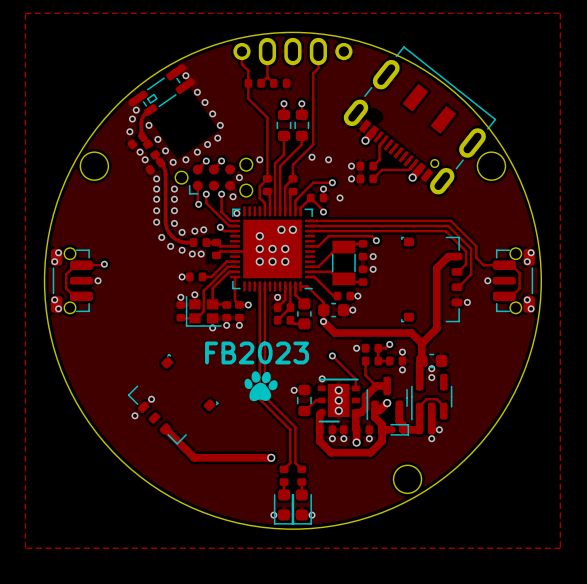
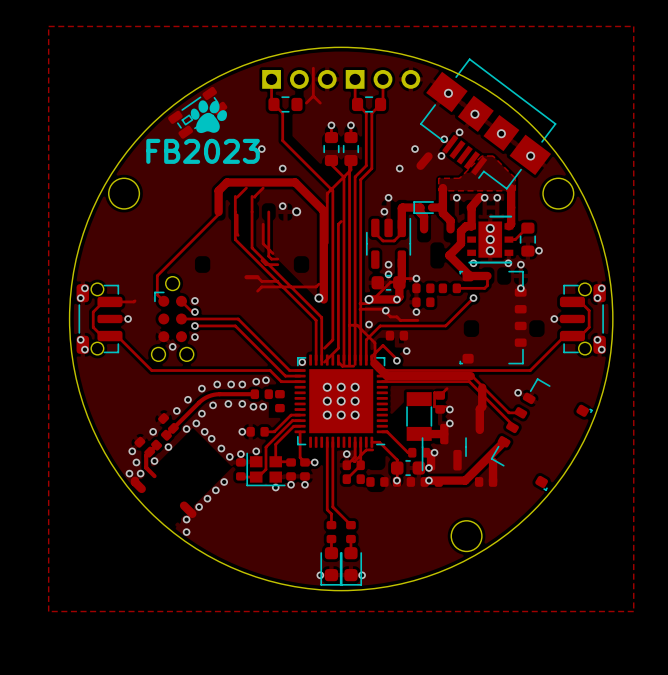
track: (241, 51) (241, 64) (248, 70) (248, 98) (267, 117) (267, 178) (259, 186) (259, 197) (264, 203) (264, 211) -> none
part: (292, 51) -> none
track: (318, 51) (318, 68) (313, 73) (313, 144) (292, 164) (292, 178) (285, 186) -> (271, 79) (271, 102) (282, 113) (282, 140) (332, 190) (332, 215)
part: none -> (299, 79)
track: none -> (355, 79) (355, 102) (366, 113) (366, 165) (355, 176) (355, 360)
track: none -> (382, 79) (382, 102) (371, 113) (371, 168) (360, 179) (360, 360)
part: none -> (382, 79)
track: (182, 68) (172, 74) -> none
via: none -> (448, 93)
via: (185, 75) -> none
track: (191, 82) (182, 88) -> none
part: (254, 83) -> none
part: (280, 83) -> none
part: none -> (285, 104)
part: none -> (369, 104)
via: (197, 92) -> none
via: none -> (474, 114)
track: (141, 96) (132, 102) -> none
via: (205, 102) -> none
part: none -> (488, 123)
track: (150, 109) (144, 114) (141, 121) (141, 135) (147, 144) -> none
via: (136, 110) -> none
via: none -> (459, 132)
via: none -> (501, 133)
via: (212, 113) -> none
via: none -> (444, 139)
via: (132, 119) -> none
part: (419, 120) -> none
via: (148, 125) -> none
via: none -> (415, 149)
via: (129, 131) -> none
via: none -> (441, 156)
zone outline: none -> (481, 156) (493, 156) (515, 178) (515, 190) (438, 190) (438, 178) (459, 178) (481, 156)
via: none -> (530, 156)
track: (283, 135) (283, 154) (275, 163) (275, 211) -> none
via: (217, 138) -> none
via: (157, 139) -> none
part: (137, 140) -> none
via: (365, 140) -> none
track: (383, 140) (379, 145) (379, 159) (373, 166) -> none
via: none -> (282, 168)
via: none -> (399, 168)
via: (207, 144) -> none
part: (151, 149) -> none
via: (165, 150) -> none
via: (140, 152) -> none
via: (197, 152) -> none
track: (155, 154) (165, 172) (167, 229) (176, 239) (193, 242) -> none
via: (312, 157) -> none
via: (145, 159) -> none
via: (185, 159) -> none
via: (259, 159) -> none
via: (328, 159) -> none
via: (206, 161) -> none
via: (221, 161) -> none
track: none -> (442, 188) (442, 213) (450, 220) (450, 229)
track: none -> (511, 188) (511, 224) (508, 226)
via: (173, 162) -> none
track: (413, 164) (408, 169) (382, 169) (373, 178) -> none
part: (155, 166) -> none
via: (351, 166) -> none
part: (366, 166) -> none
track: none -> (235, 196) (235, 239) (316, 320) (316, 360)
track: none -> (252, 196) (252, 247) (321, 317) (321, 360)
via: none -> (388, 197)
via: none -> (456, 197)
via: none -> (484, 197)
via: none -> (497, 197)
part footprint: [356, 174, 377, 184] -> [413, 201, 435, 214]
part rotation: 0° (213, 177) -> 90° clockwise (172, 318)
part position: (213, 177) -> (172, 318)
via: (412, 177) -> none
via: (156, 178) -> none
via: (351, 178) -> none
track: none -> (470, 207) (471, 226) (465, 226) (461, 231) (461, 243) (449, 255) (469, 276) (487, 276) (487, 285) (484, 288) (456, 288)
via: none -> (296, 211)
track: (332, 182) (313, 182) (295, 200) -> (331, 164) (343, 177) (343, 231)
part: (267, 185) -> none
part: (292, 185) -> none
via: (156, 189) -> none
via: (174, 189) -> none
via: (323, 189) -> none
track: (267, 191) (269, 194) (269, 211) -> none
track: (206, 194) (206, 203) (226, 223) -> (268, 211) (268, 256)
via: (206, 194) -> none
via: (221, 194) -> none
via: (233, 196) -> none
part: (317, 197) -> none
track: none -> (375, 227) (375, 233) (382, 240) (394, 240) (401, 233) (401, 208) (420, 207) (420, 212) (424, 216) (424, 229)
via: (340, 197) -> none
via: none -> (490, 228)
track: none -> (527, 228) (515, 239) (508, 239)
via: (156, 199) -> none
via: (174, 199) -> none
via: (198, 204) -> none
track: (300, 208) (310, 197) (323, 212) -> (349, 239) (350, 164)
via: none -> (490, 239)
part: none -> (527, 239)
via: (156, 210) -> none
via: (174, 210) -> none
track: none -> (332, 243) (332, 325)
track: none -> (338, 243) (338, 325)
track: none -> (343, 243) (343, 325)
track: none -> (349, 243) (349, 360)
via: (323, 212) -> none
via: (236, 213) -> none
via: none -> (490, 250)
via: none -> (539, 250)
track: (310, 220) (450, 220) (476, 246) (476, 257) (483, 265) (504, 265) -> none
via: (156, 222) -> none
via: (174, 223) -> none
track: (310, 226) (448, 226) (471, 248) (471, 274) (457, 287) -> none
track: none -> (401, 259) (399, 297) (396, 299) (369, 299)
via: (220, 227) -> none
via: (203, 229) -> none
via: (281, 229) -> none
via: (292, 229) -> none
via: none -> (473, 263)
via: none -> (508, 263)
via: (194, 231) -> none
track: (310, 231) (445, 231) (466, 251) (466, 264) (457, 271) -> none
via: none -> (388, 264)
via: none -> (520, 264)
via: (182, 232) -> none
via: (259, 236) -> none
via: (161, 237) -> none
via: none -> (388, 274)
track: (376, 240) (371, 236) (328, 236) (318, 246) (310, 246) -> none
via: (376, 240) -> none
part: (199, 242) -> none
via: none -> (416, 278)
via: (170, 246) -> none
part: none -> (388, 282)
part: (216, 248) -> none
via: (259, 248) -> none
part position: (272, 248) -> (341, 401)
via: (272, 248) -> none
via: (285, 248) -> none
via: (182, 250) -> none
part rotation: 0° (362, 250) -> 90° clockwise (423, 288)
part: none -> (449, 288)
via: none -> (520, 288)
via: (192, 254) -> none
via: (201, 254) -> none
via: (373, 256) -> none
track: (457, 256) (448, 256) (436, 268) (436, 328) (421, 343) (411, 333) -> (520, 412) (508, 412) (470, 376)
track: (234, 261) (226, 261) (211, 276) (202, 276) -> (300, 415) (291, 415) (274, 431) (264, 431)
via: (259, 261) -> none
via: (285, 261) -> none
track: none -> (473, 298) (445, 325) (380, 325) (366, 339) (366, 360)
via: none -> (473, 298)
track: none -> (323, 299) (323, 211) (295, 182) (226, 182) (218, 190) (218, 214) (157, 275) (157, 294) (163, 301)
via: none -> (369, 299)
part position: (343, 262) -> (419, 416)
via: none -> (396, 299)
via: (104, 264) -> none
track: none -> (181, 301) (192, 312) (194, 312)
via: none -> (194, 300)
track: (234, 266) (227, 266) (203, 290) (203, 311) (196, 318) (180, 317) -> (300, 420) (292, 420) (265, 447) (265, 469) (258, 477) (240, 476)
via: (373, 269) -> none
track: (234, 271) (229, 271) (212, 288) (212, 304) (226, 304) -> (300, 426) (293, 426) (275, 444) (275, 461) (291, 462)
via: none -> (385, 310)
via: none -> (194, 312)
via: none -> (416, 312)
part rotation: 0° (362, 275) -> 90° clockwise (423, 302)
via: (182, 276) -> none
part: (196, 276) -> none
track: (234, 276) (234, 300) (239, 304) (248, 304) -> (300, 431) (300, 457) (304, 462) (314, 462)
track: (310, 276) (314, 276) (333, 296) (337, 296) -> (382, 431) (387, 431) (408, 452) (412, 452)
track: none -> (181, 318) (238, 318) (289, 370) (300, 370)
via: none -> (369, 324)
track: (259, 286) (259, 399) (290, 429) (290, 462) (283, 469) -> (327, 442) (327, 509) (331, 514) (331, 525)
track: (264, 286) (264, 396) (295, 427) (295, 462) -> (332, 442) (332, 507) (343, 518)
track: none -> (194, 325) (235, 325) (285, 376) (300, 376)
via: none -> (194, 325)
via: (194, 294) -> none
track: (295, 294) (304, 303) -> (343, 334) (343, 360)
track: none -> (109, 336) (117, 336) (151, 370) (270, 370) (281, 381) (300, 381)
via: (357, 296) -> none
track: none -> (572, 336) (564, 336) (530, 370) (382, 370)
via: none -> (194, 337)
via: (180, 297) -> none
via: (277, 297) -> none
via: (467, 302) -> none
via: (248, 304) -> none
via: none -> (172, 346)
part: (283, 307) -> none
part: (333, 310) -> none
part: (180, 311) -> none
part position: (203, 311) -> (265, 469)
part: (226, 311) -> none
part: (239, 311) -> none
part: (304, 313) -> none
track: none -> (371, 360) (371, 356) (382, 345) (396, 360)
via: none -> (396, 360)
via: none -> (302, 362)
part: (283, 320) -> none
via: (323, 321) -> none
via: (226, 325) -> none
via: (239, 325) -> none
via: (212, 327) -> none
via: none -> (265, 380)
via: none -> (256, 381)
track: none -> (382, 381) (469, 381) (512, 424) (512, 427)
via: none -> (217, 384)
via: none -> (231, 384)
via: none -> (242, 384)
via: none -> (327, 387)
via: none -> (341, 387)
via: none -> (355, 387)
via: none -> (201, 388)
via: (389, 344) -> none
via: (356, 348) -> none
part: (371, 348) -> none
via: none -> (518, 392)
track: none -> (254, 394) (219, 394) (208, 396) (199, 402) (166, 435)
part: none -> (261, 394)
text position: FB2023 (257, 352) -> FB2023 (203, 151)
via: (402, 352) -> none
via: none -> (187, 399)
part: none -> (279, 401)
via: none -> (327, 401)
via: none -> (341, 401)
via: none -> (355, 401)
track: (332, 355) (355, 379) (355, 388) -> none
via: (332, 355) -> none
part: none -> (440, 402)
via: none -> (228, 403)
via: none -> (242, 403)
via: none -> (213, 405)
via: none -> (253, 406)
via: none -> (263, 406)
track: (365, 361) (365, 375) (376, 386) (365, 396) (365, 408) (361, 412) (355, 412) (356, 442) -> none
part: (371, 361) -> none
part: (396, 361) -> none
part: (431, 361) -> none
via: none -> (449, 409)
via: none -> (176, 410)
via: none -> (201, 413)
via: none -> (327, 415)
via: none -> (341, 415)
via: none -> (355, 415)
via: (431, 368) -> none
via: (402, 369) -> none
part: none -> (168, 423)
via: none -> (196, 423)
via: none -> (449, 423)
via: (431, 377) -> none
via: (322, 378) -> none
via: none -> (186, 429)
via: none -> (153, 431)
via: none -> (204, 431)
via: none -> (242, 431)
part: none -> (257, 431)
drawing position: (261, 386) -> (208, 116)
part: none -> (541, 434)
via: none -> (211, 438)
via position: (294, 390) -> (346, 454)
via: (338, 390) -> none
part: none -> (161, 440)
track: none -> (355, 442) (355, 456) (346, 465)
track: none -> (360, 442) (360, 465) (346, 479)
track: none -> (371, 442) (379, 442) (397, 460) (396, 480)
track: none -> (504, 441) (465, 480) (428, 480)
track: none -> (156, 445) (146, 455) (146, 467) (154, 476)
part: none -> (144, 447)
via: none -> (168, 447)
part rotation: 0° (431, 397) -> 180° (388, 243)
part position: (431, 397) -> (388, 243)
via: (151, 399) -> none
part: (173, 399) -> none
via: none -> (221, 448)
part: (304, 400) -> none
part rotation: 0° (338, 400) -> 180° (490, 239)
part position: (338, 400) -> (490, 239)
via: (338, 400) -> none
via: none -> (132, 451)
via: none -> (256, 451)
part: none -> (419, 452)
via: none -> (434, 452)
track: (387, 403) (380, 409) (375, 409) (375, 417) (382, 424) (382, 441) (370, 452) (331, 452) (319, 441) (319, 414) (321, 412) -> none
via: (387, 403) -> none
via: none -> (240, 454)
via: none -> (229, 456)
track: (399, 409) (399, 421) (402, 424) (402, 429) (419, 429) (419, 406) (426, 399) (436, 399) (443, 406) (443, 411) -> none
via: none -> (154, 461)
via: (338, 410) -> none
via: none -> (136, 462)
via: none -> (314, 462)
part: none -> (353, 465)
via: (134, 415) -> none
part: none -> (408, 468)
via: none -> (428, 468)
part: none -> (240, 469)
part: none -> (291, 469)
part: none -> (304, 469)
via: none -> (129, 473)
via: none -> (140, 473)
part: none -> (353, 479)
track: none -> (135, 480) (141, 488)
track: (165, 428) (194, 457) (271, 457) -> none
via: none -> (396, 480)
via: none -> (428, 480)
via: none -> (224, 481)
track: (382, 429) (392, 429) -> (432, 207) (442, 207)
part: (399, 429) -> none
via: (439, 429) -> none
via: none -> (291, 484)
via: none -> (304, 484)
via: none -> (275, 487)
via: none -> (215, 490)
via: (332, 438) -> none
via: (343, 438) -> none
via: (369, 438) -> none
via: (431, 438) -> none
via: (356, 442) -> none
via: none -> (207, 498)
track: none -> (184, 505) (192, 513)
via: none -> (199, 507)
via: (271, 457) -> none
via: none -> (186, 519)
via: none -> (186, 532)

